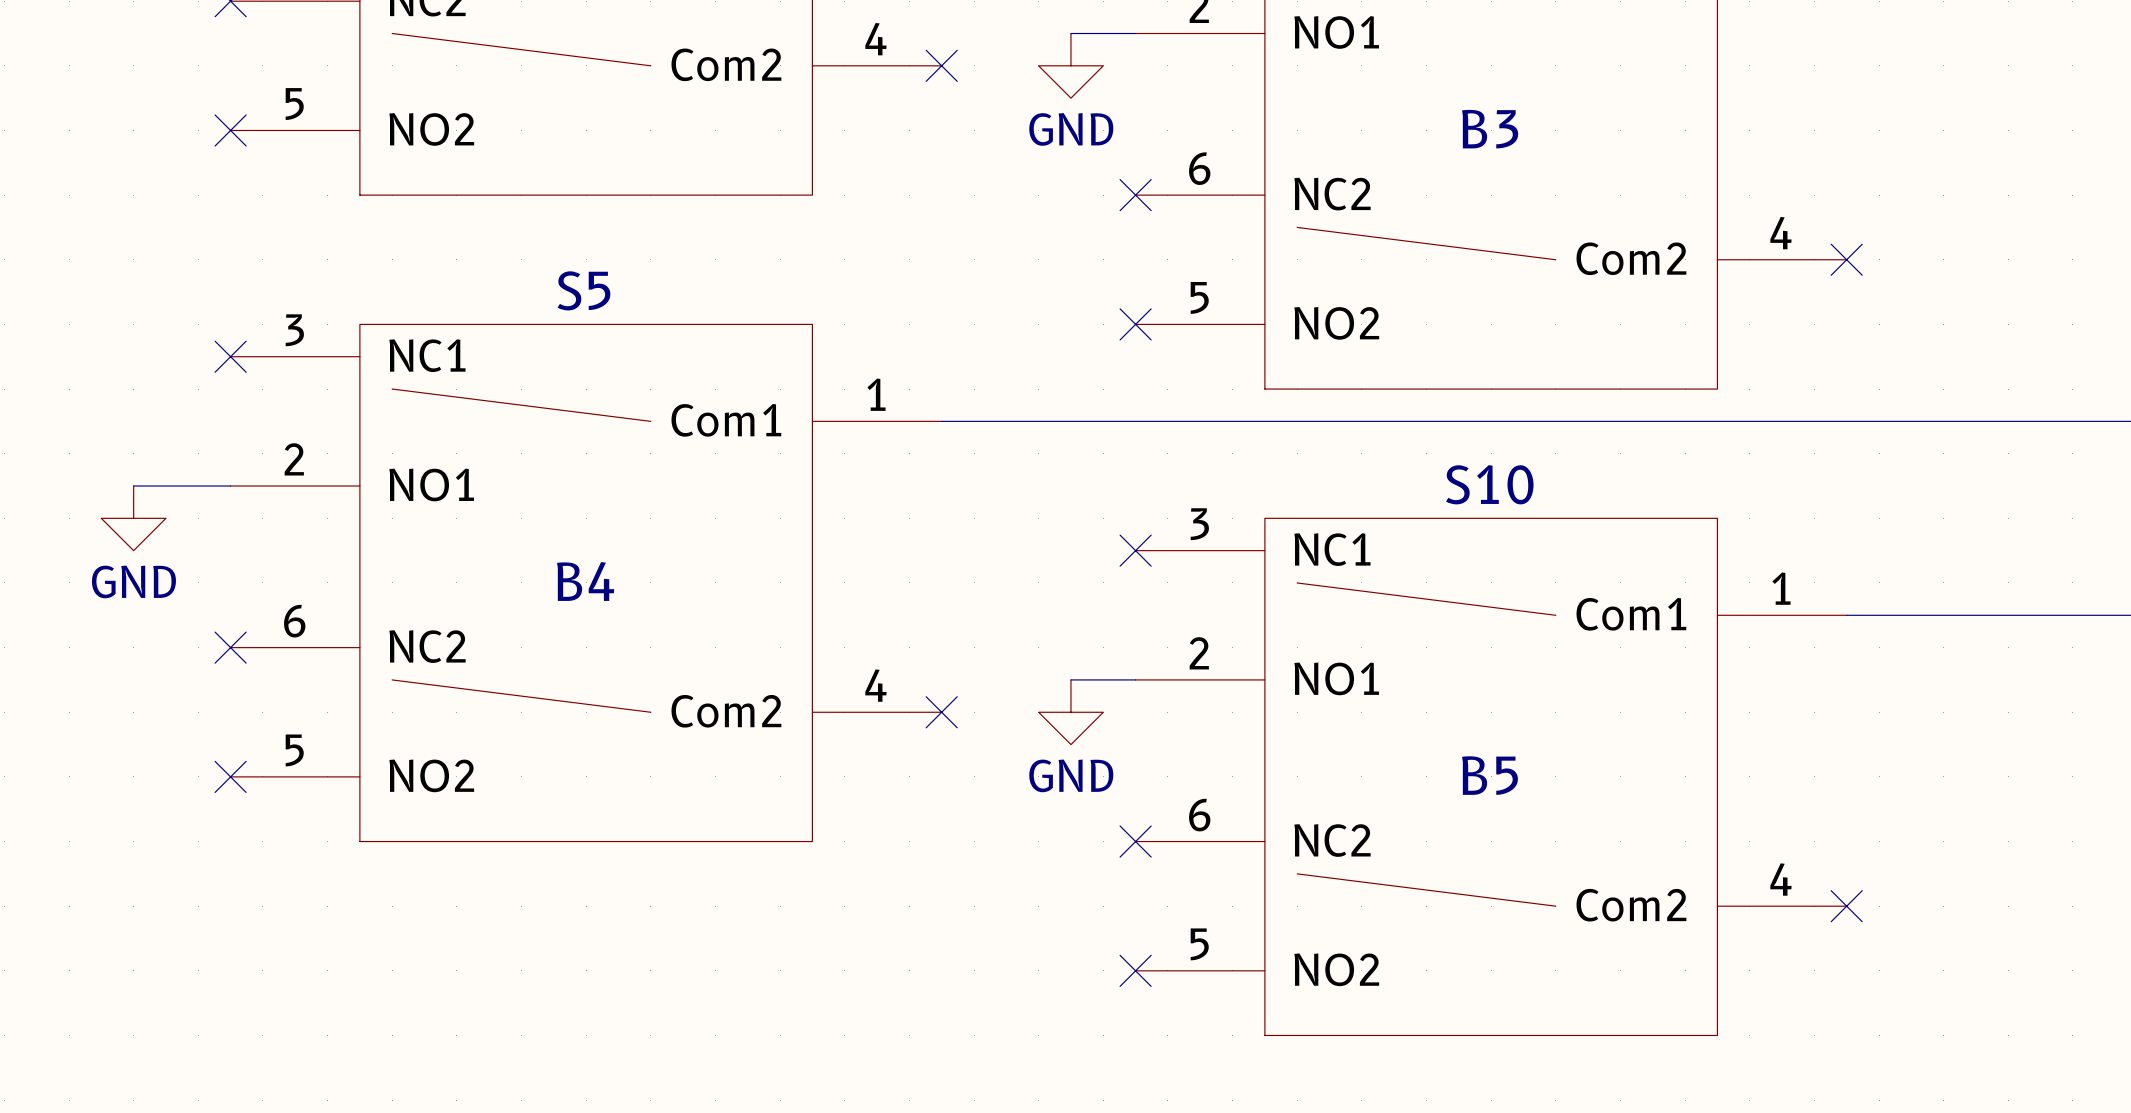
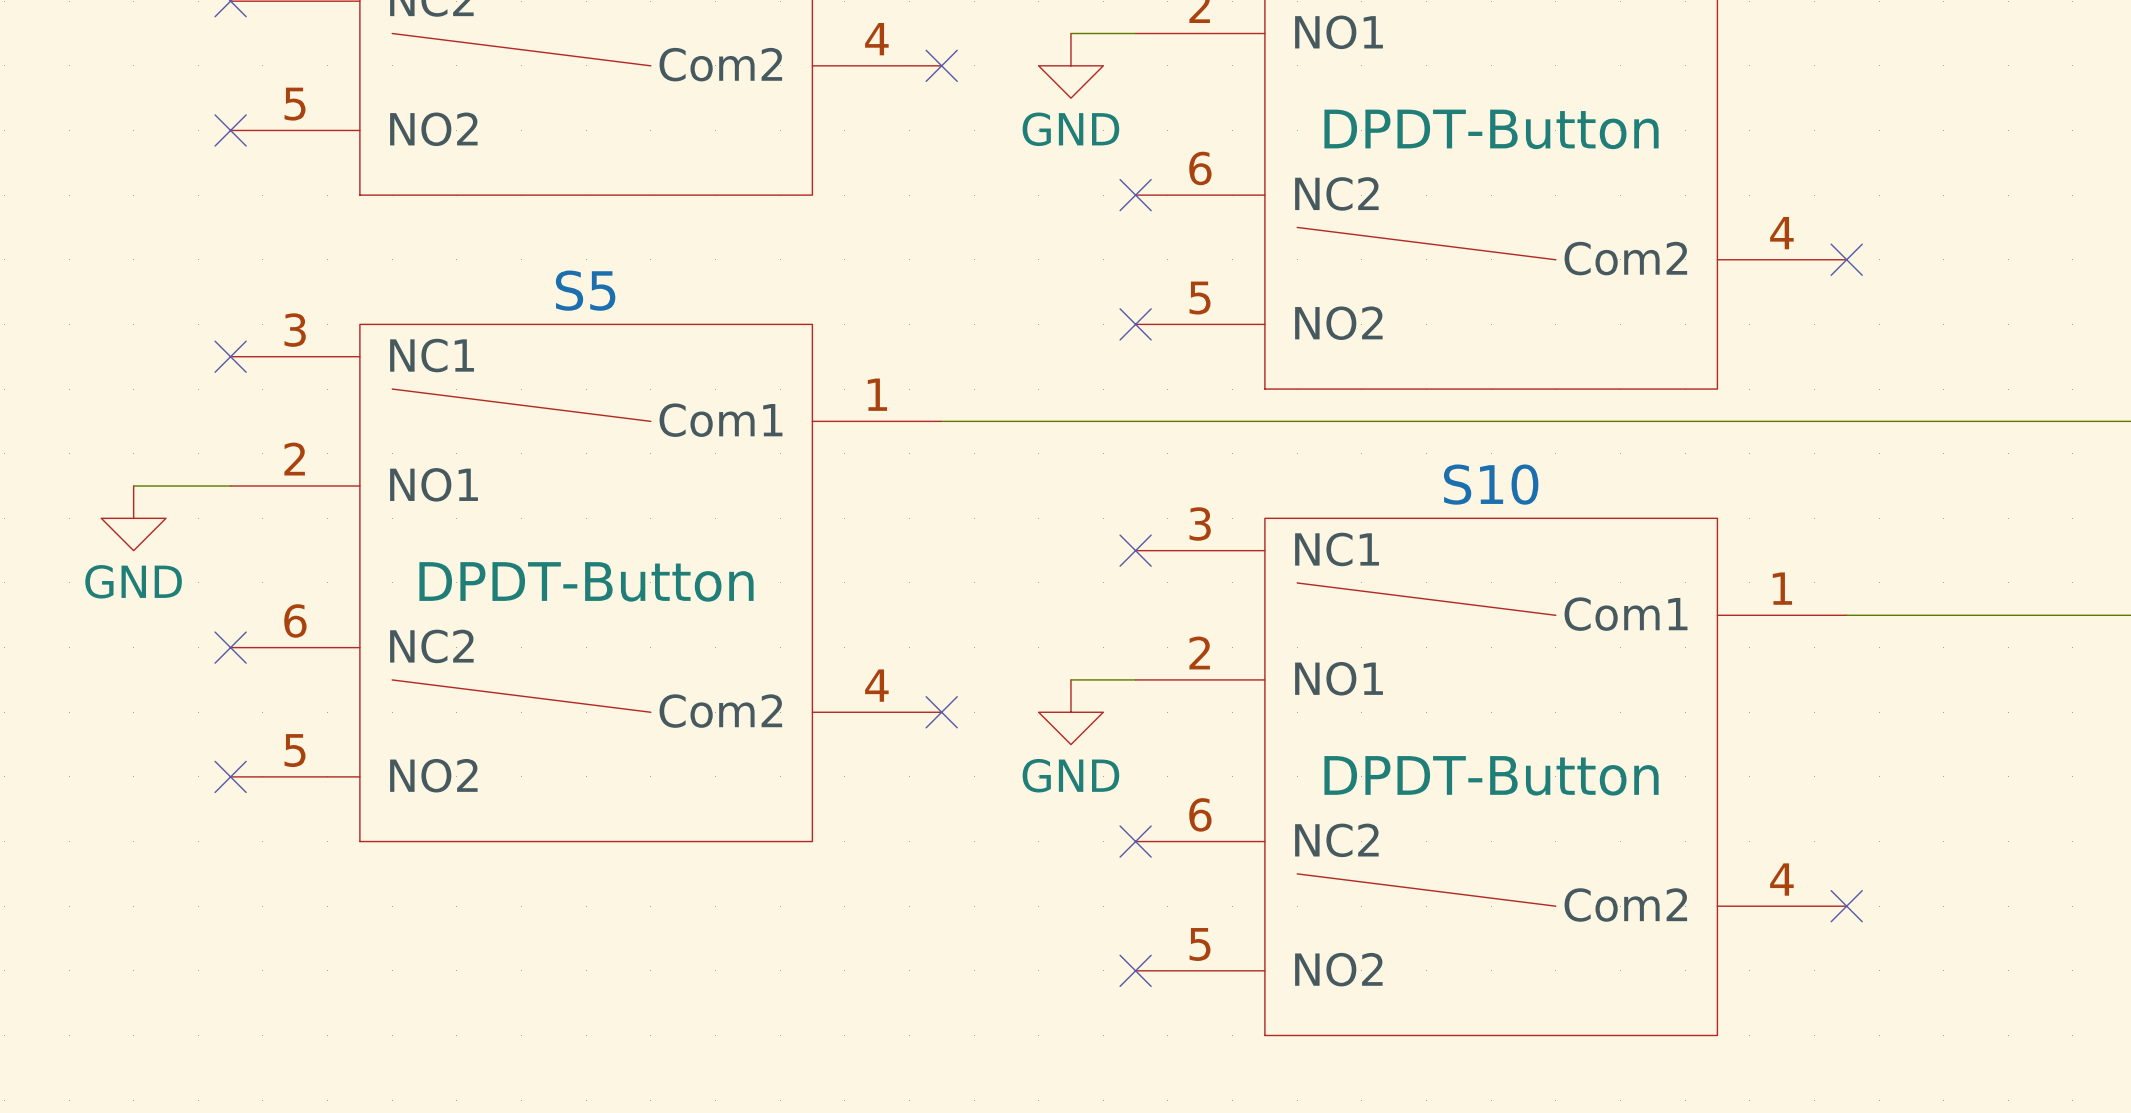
part value: B3 (1490, 129) -> DPDT-Button (1491, 129)
S5 value: B4 (585, 581) -> DPDT-Button (586, 581)
S10 value: B5 (1490, 775) -> DPDT-Button (1491, 775)

